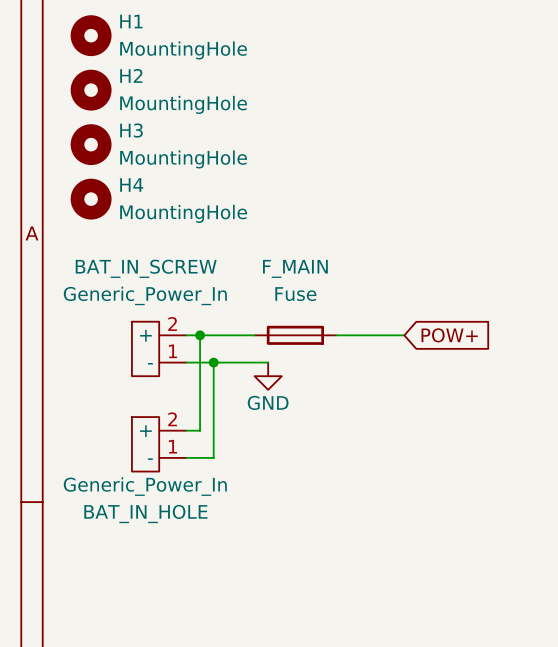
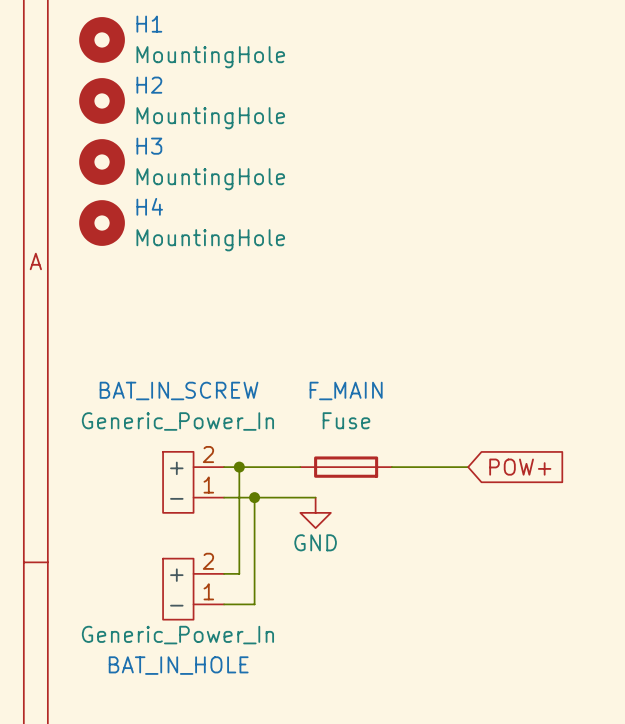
wire: (186, 335) (254, 335) -> (224, 467) (300, 467)
wire: (200, 335) (200, 430) (186, 430) -> none
junction: (200, 335) -> none
F_MAIN position: (295, 335) -> (346, 467)
wire: (336, 335) (404, 335) -> (391, 467) (468, 467)
global label position: POW+ (449, 335) -> POW+ (520, 467)
BAT_IN_SCREW position: (159, 348) -> (193, 482)
wire: (186, 362) (268, 362) -> (224, 497) (315, 497)
wire: (213, 362) (213, 417) -> none
junction: (213, 362) -> none
power symbol position: GND (268, 376) -> GND (315, 512)
junction: none -> (239, 467)
BAT_IN_HOLE position: (159, 444) -> (193, 589)
wire: none -> (254, 497) (254, 604) (224, 604)
junction: none -> (254, 497)
wire: (186, 457) (213, 457) -> (224, 573) (239, 573) (239, 512)

